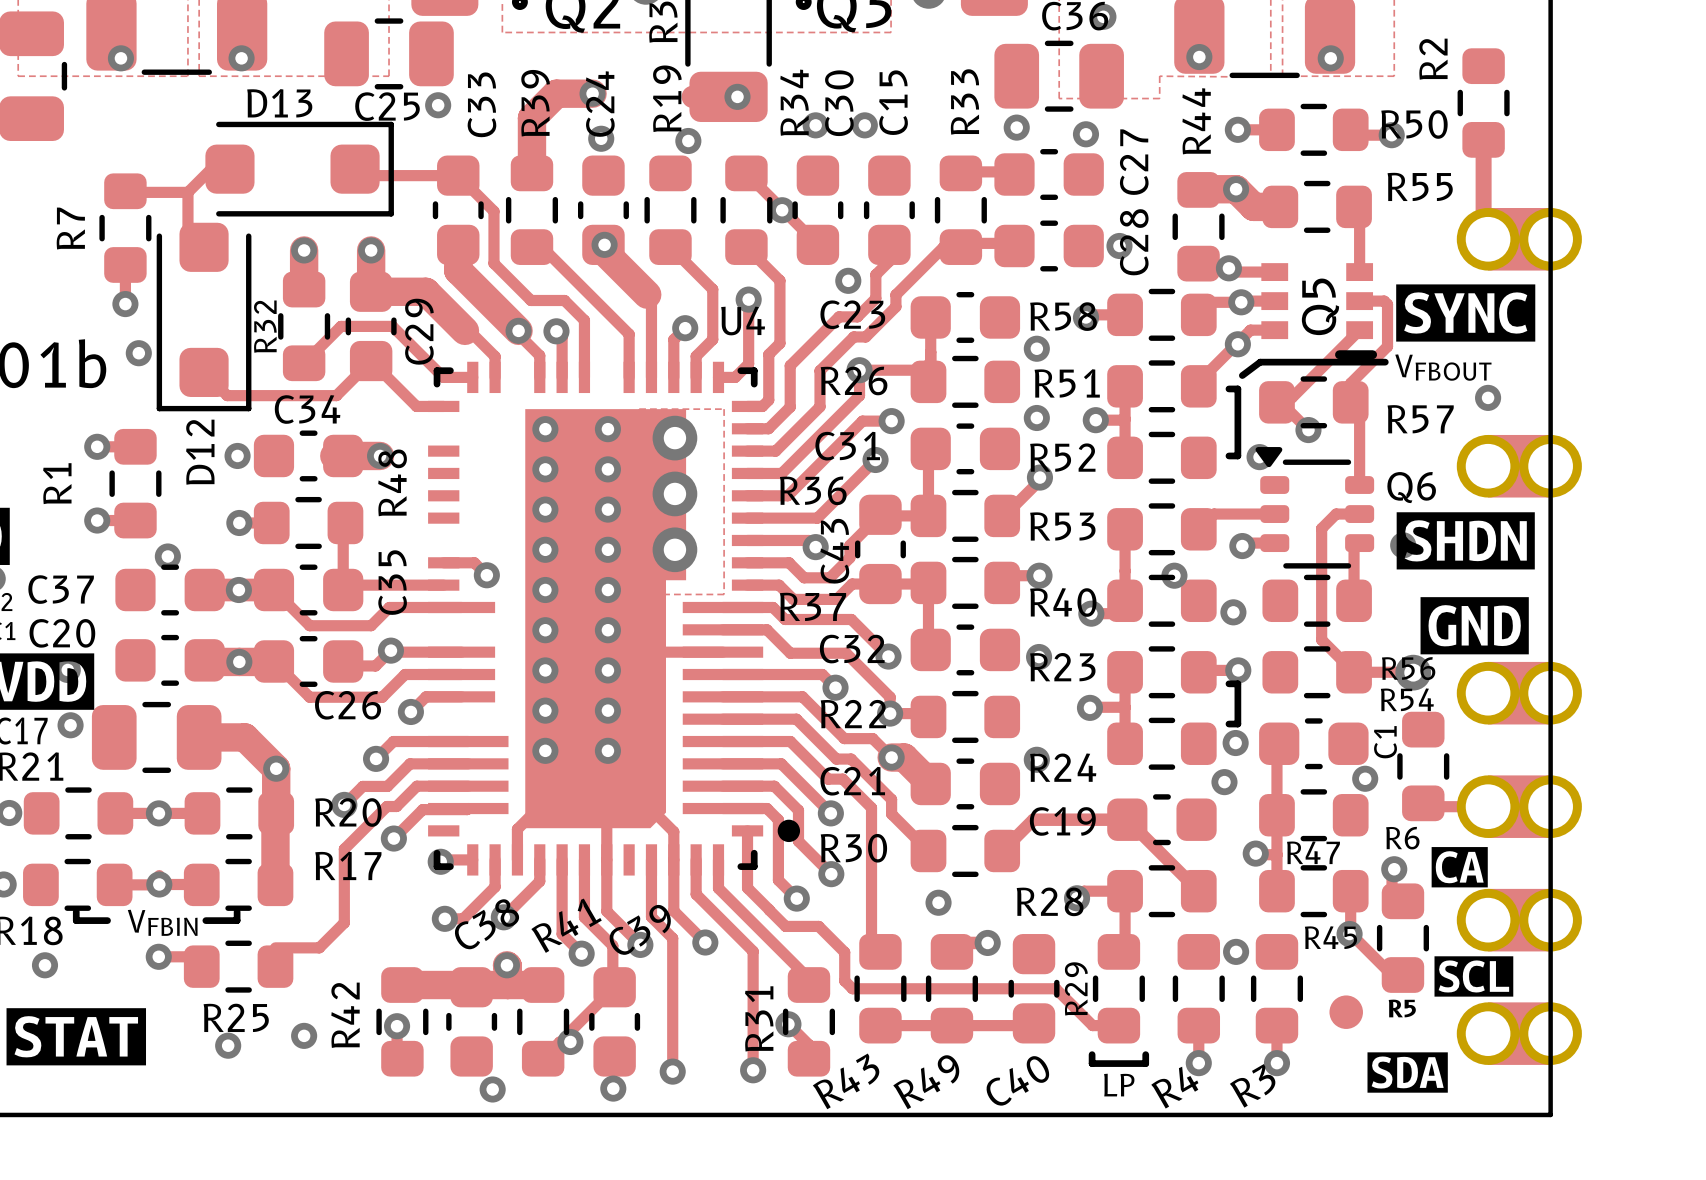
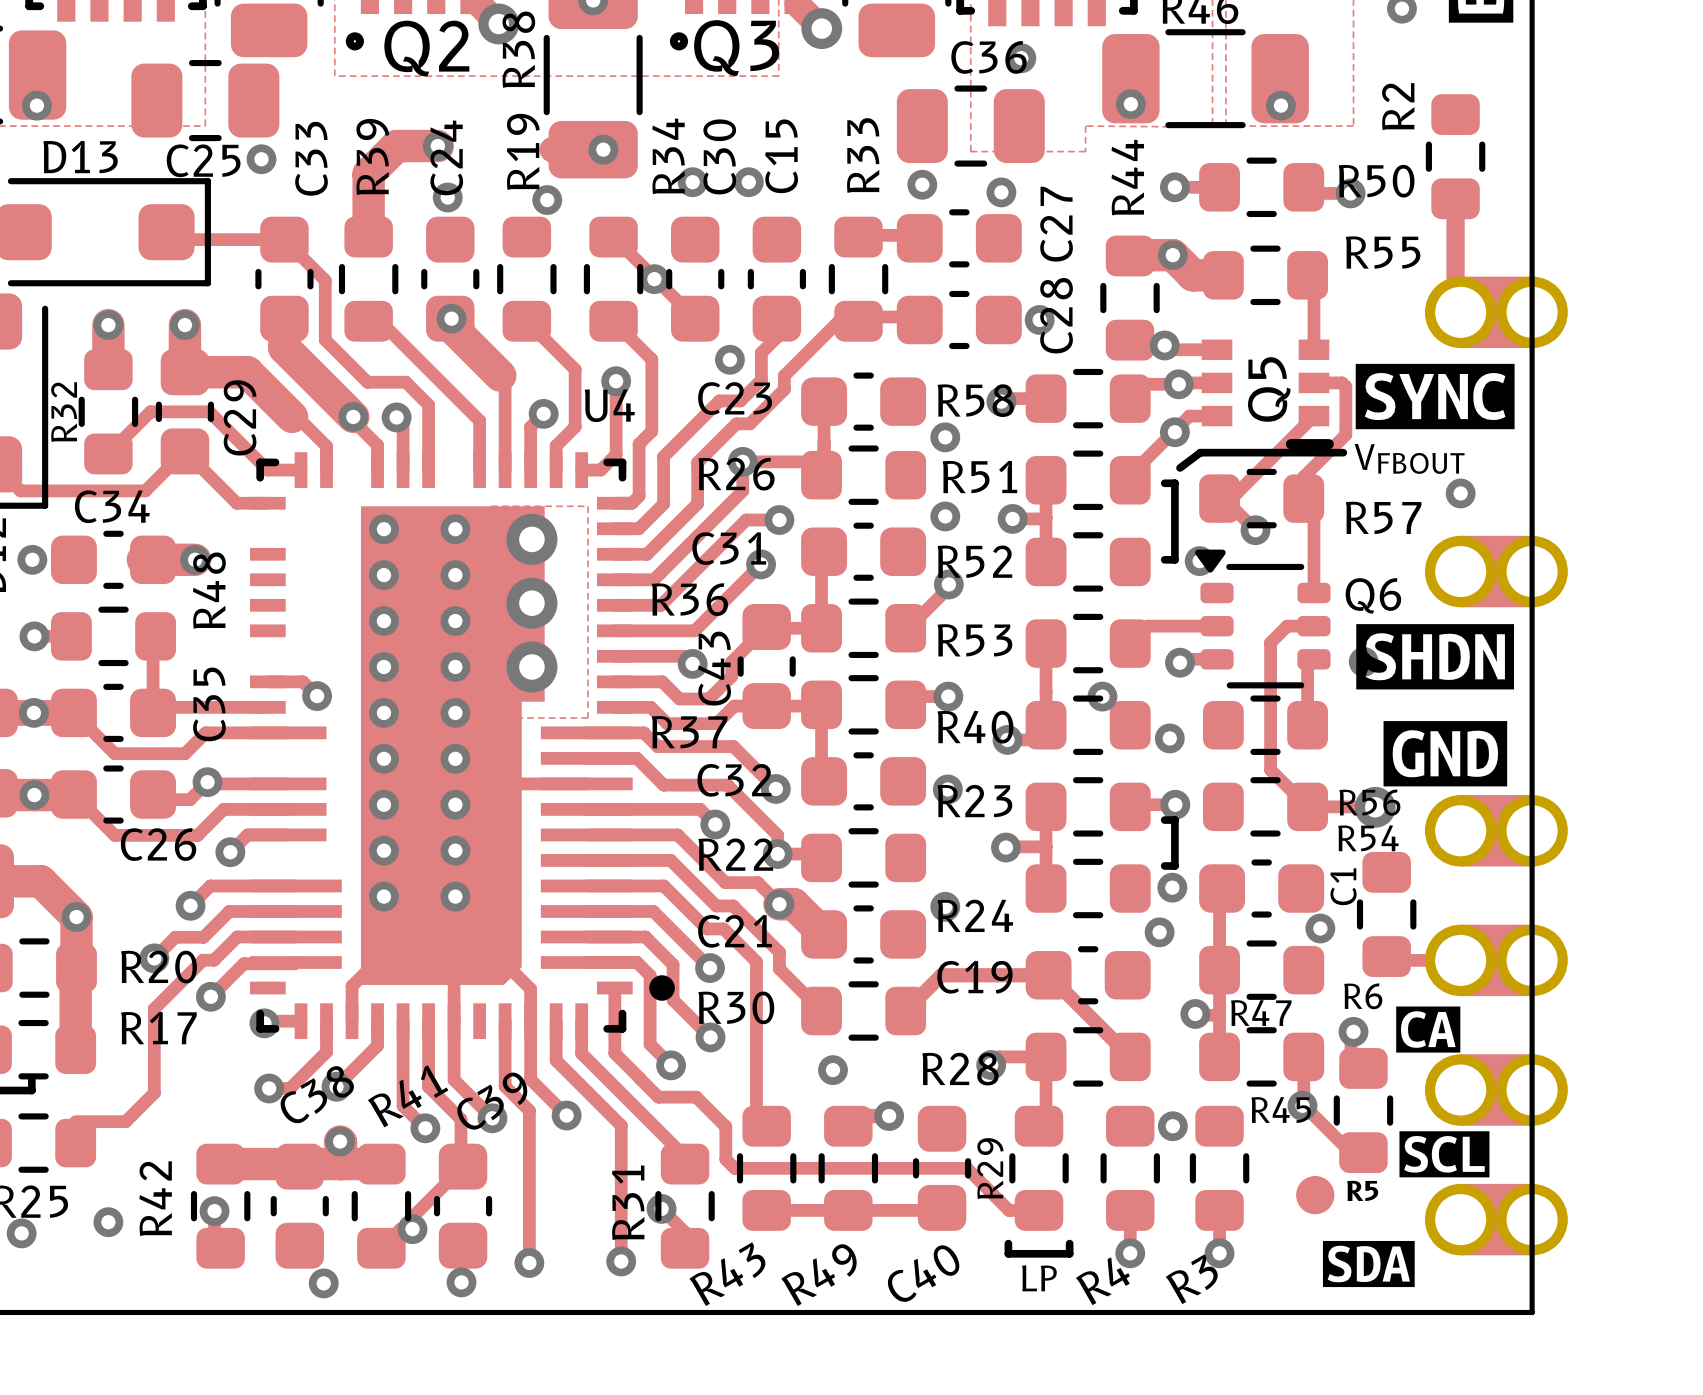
part position: (1346, 1012) -> (1315, 1195)

